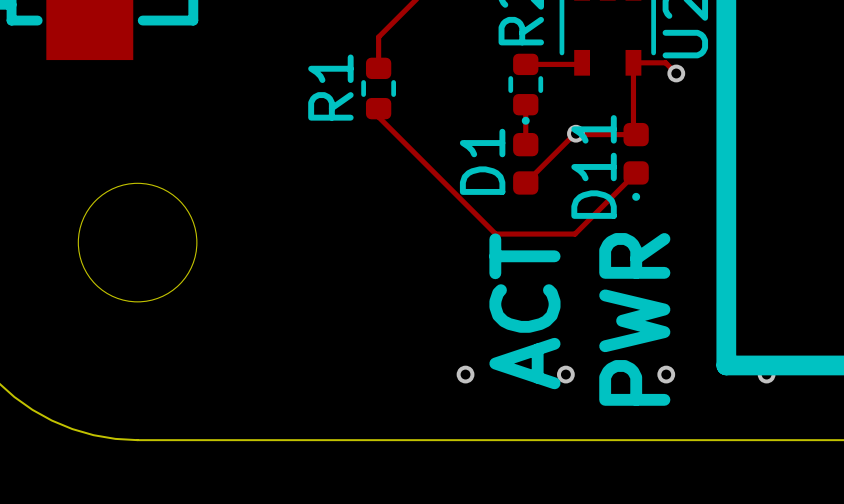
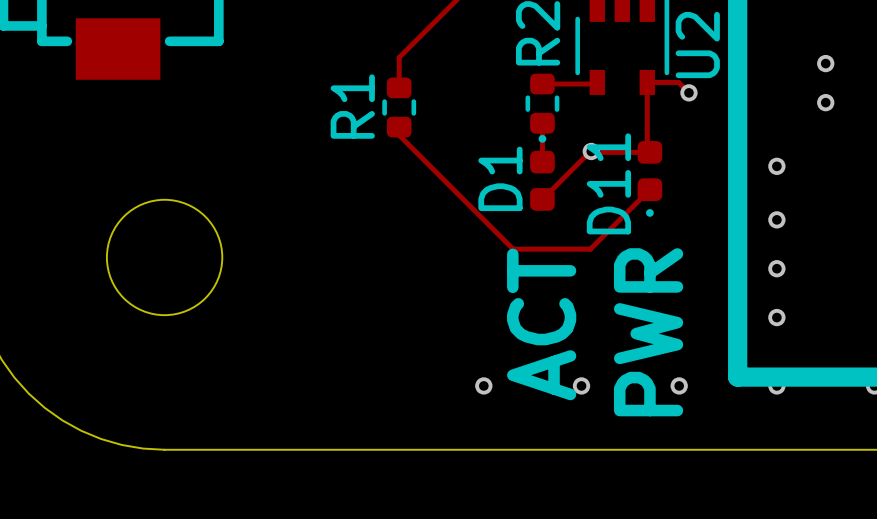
via: none -> (825, 63)
via: none -> (825, 102)
via: none -> (776, 166)
via: none -> (776, 219)
via: none -> (776, 268)
via: none -> (776, 317)

